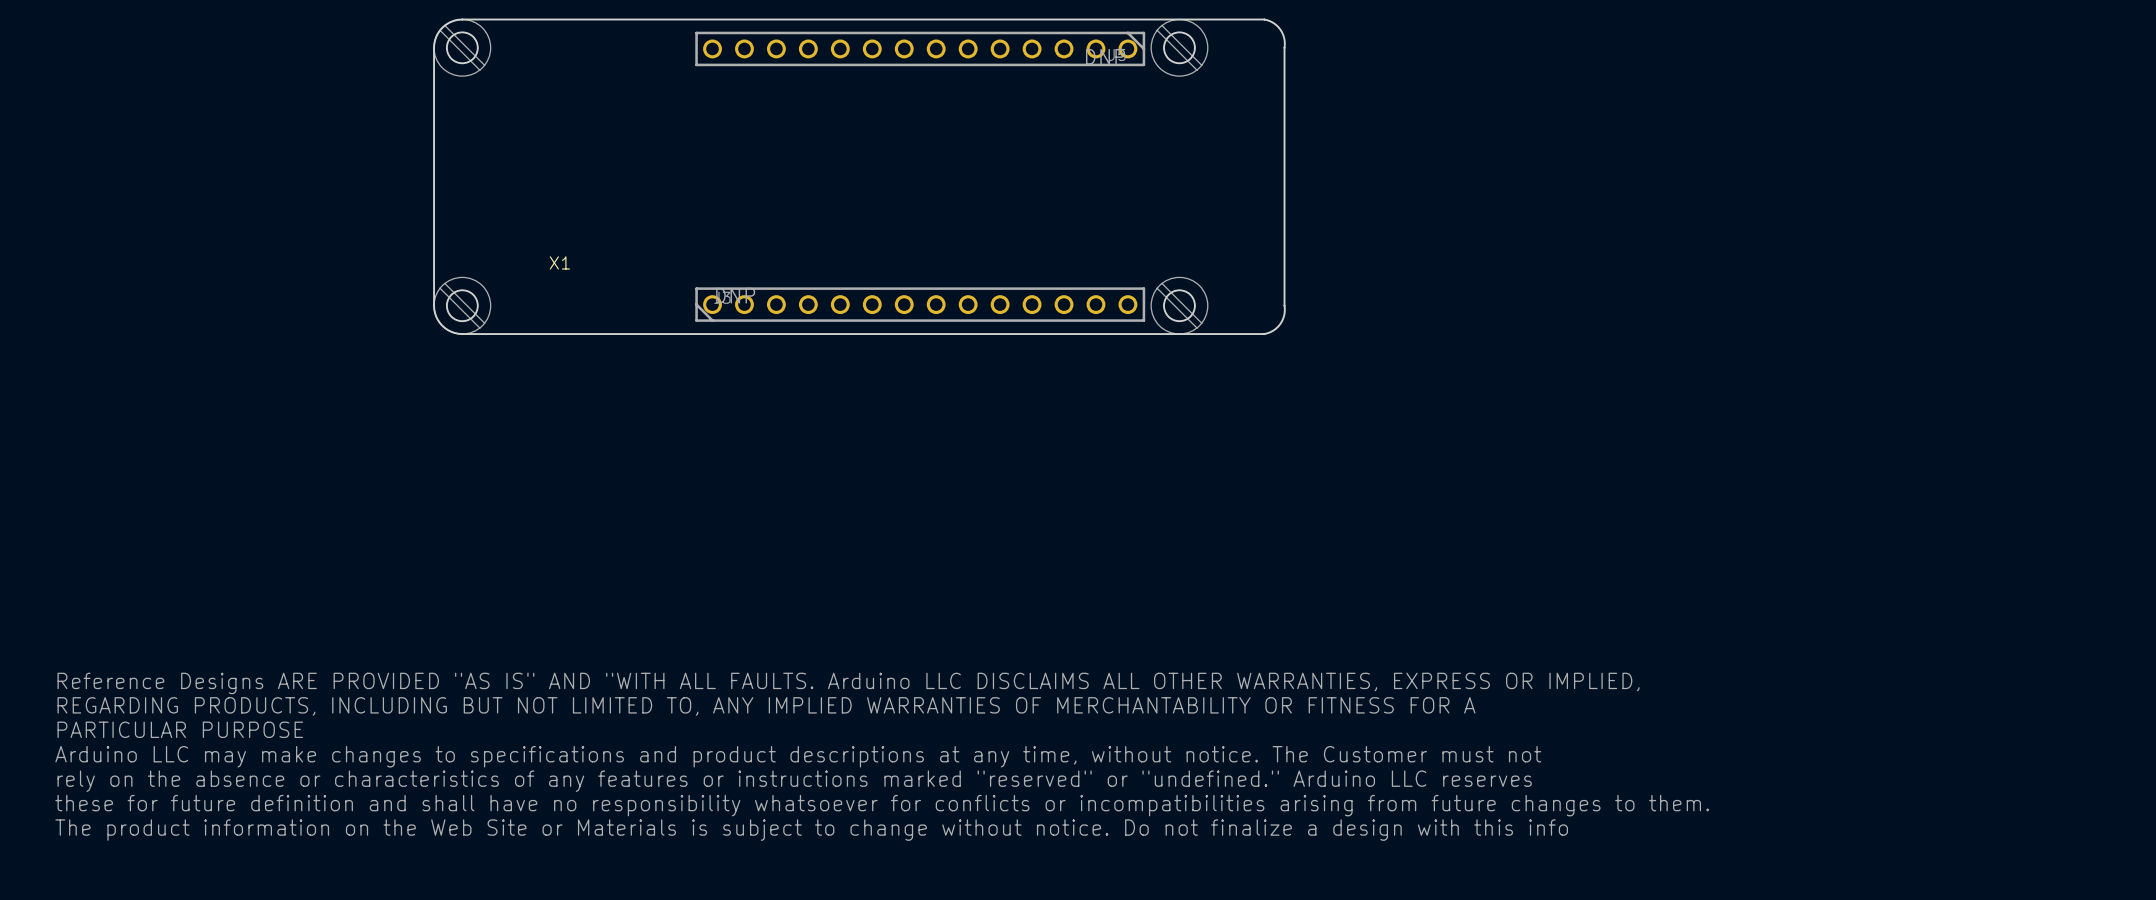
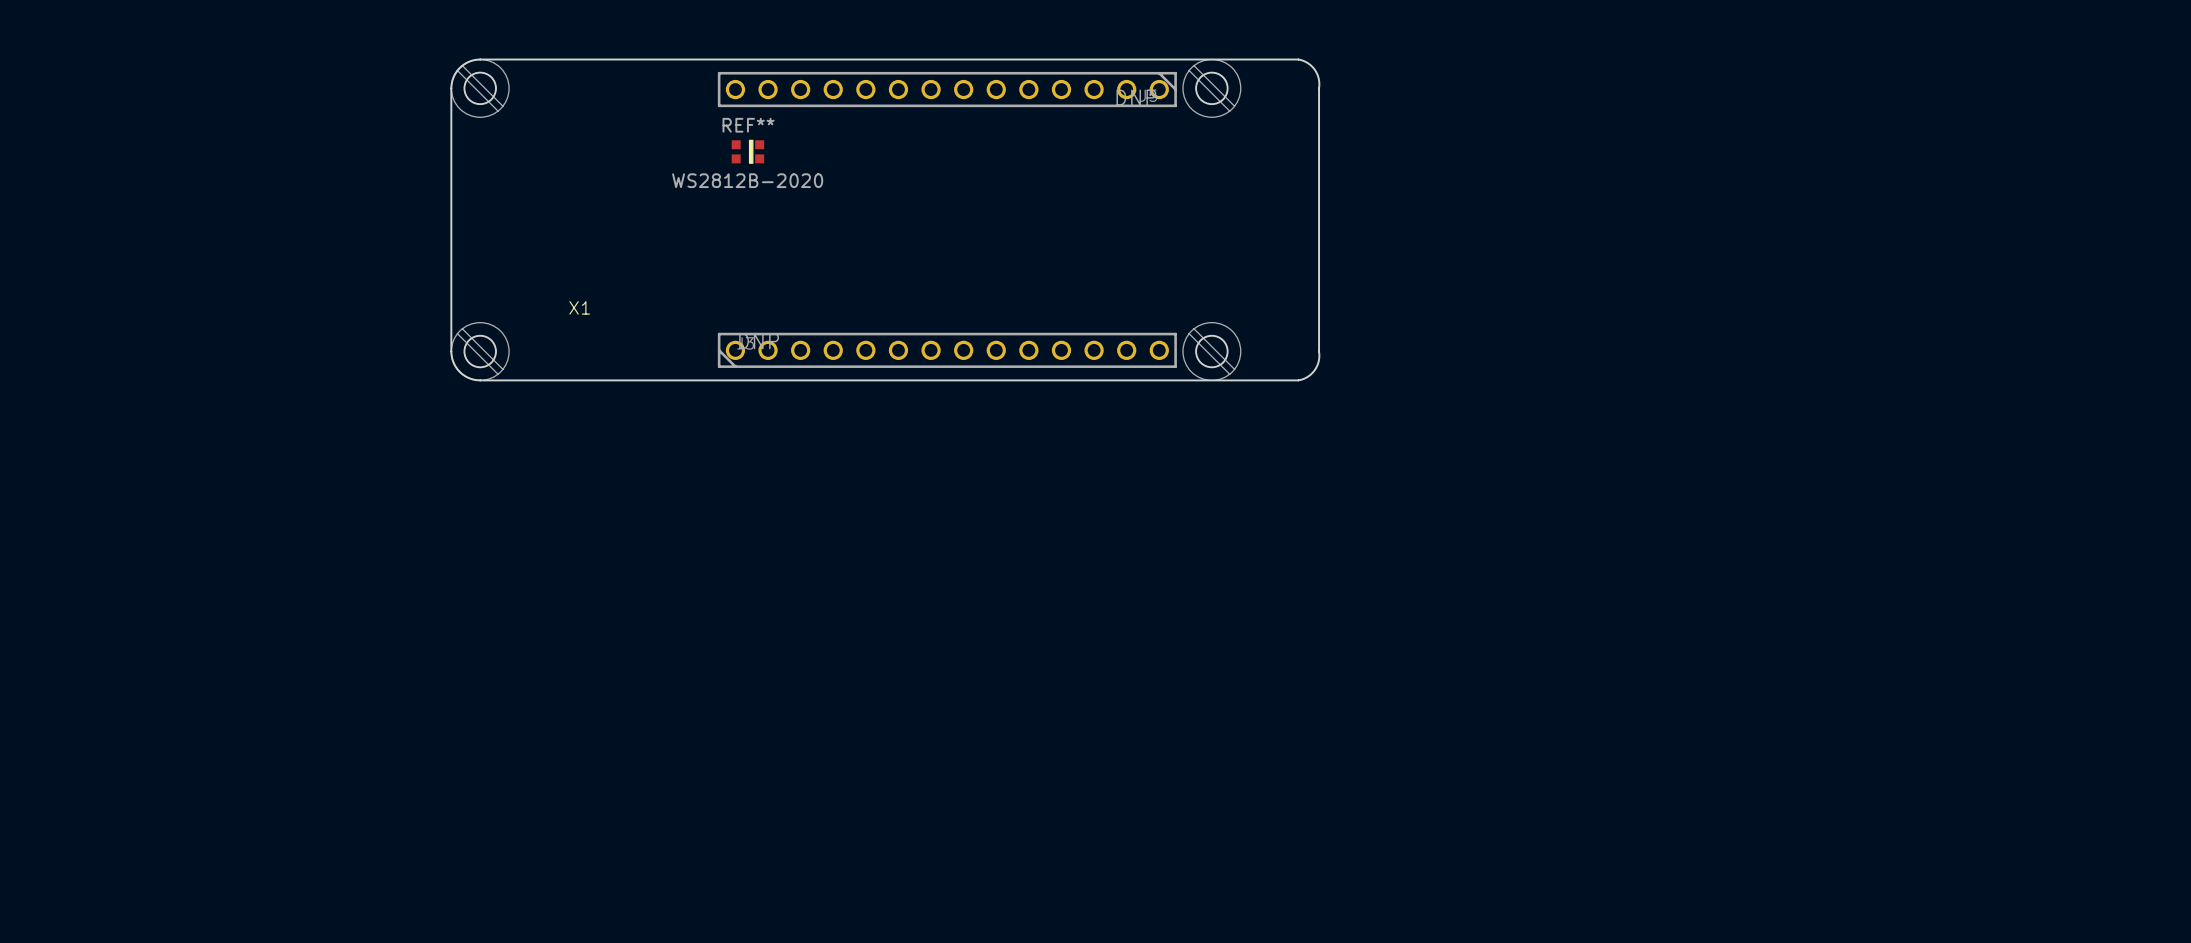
REF**: none -> WS2812B-2020 (747, 151)
drawing: [55, 672, 1709, 841] -> none

